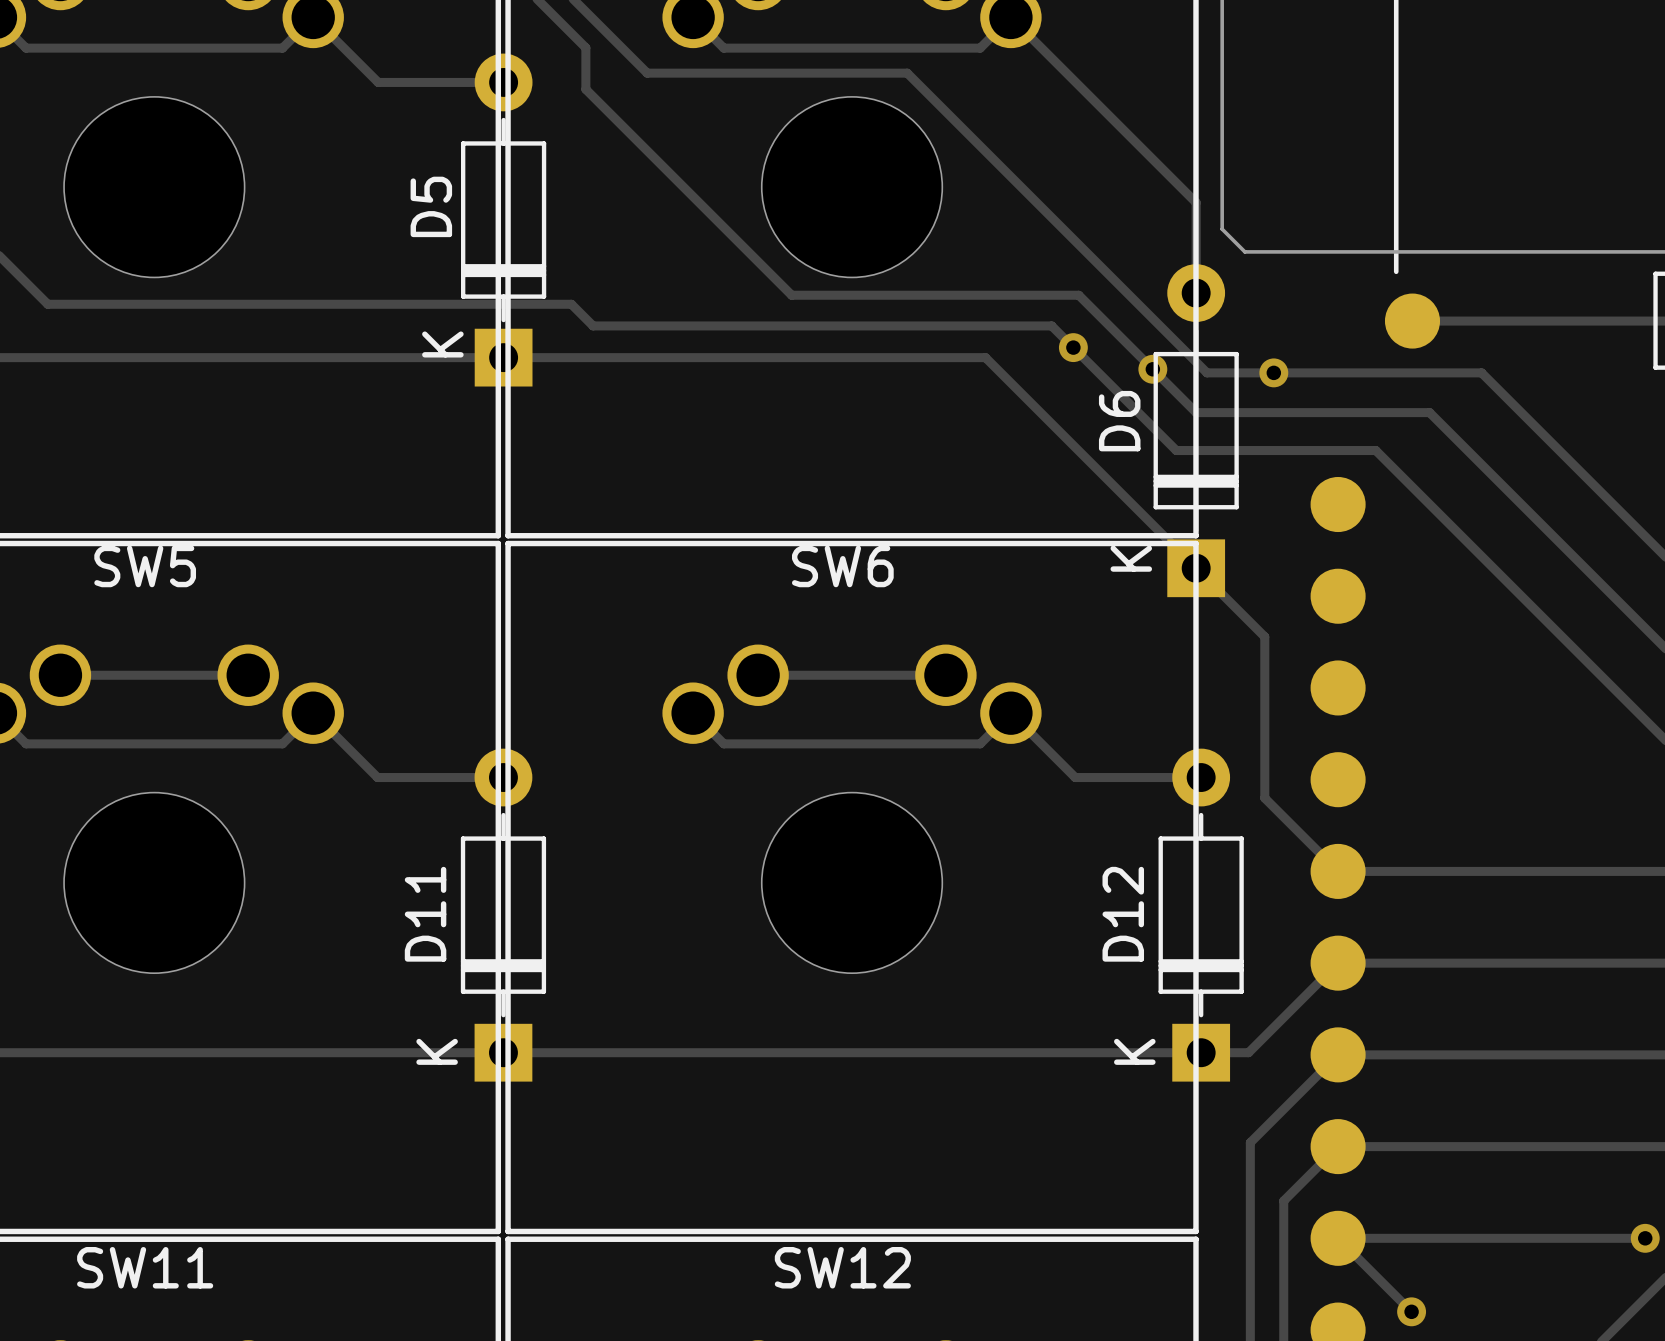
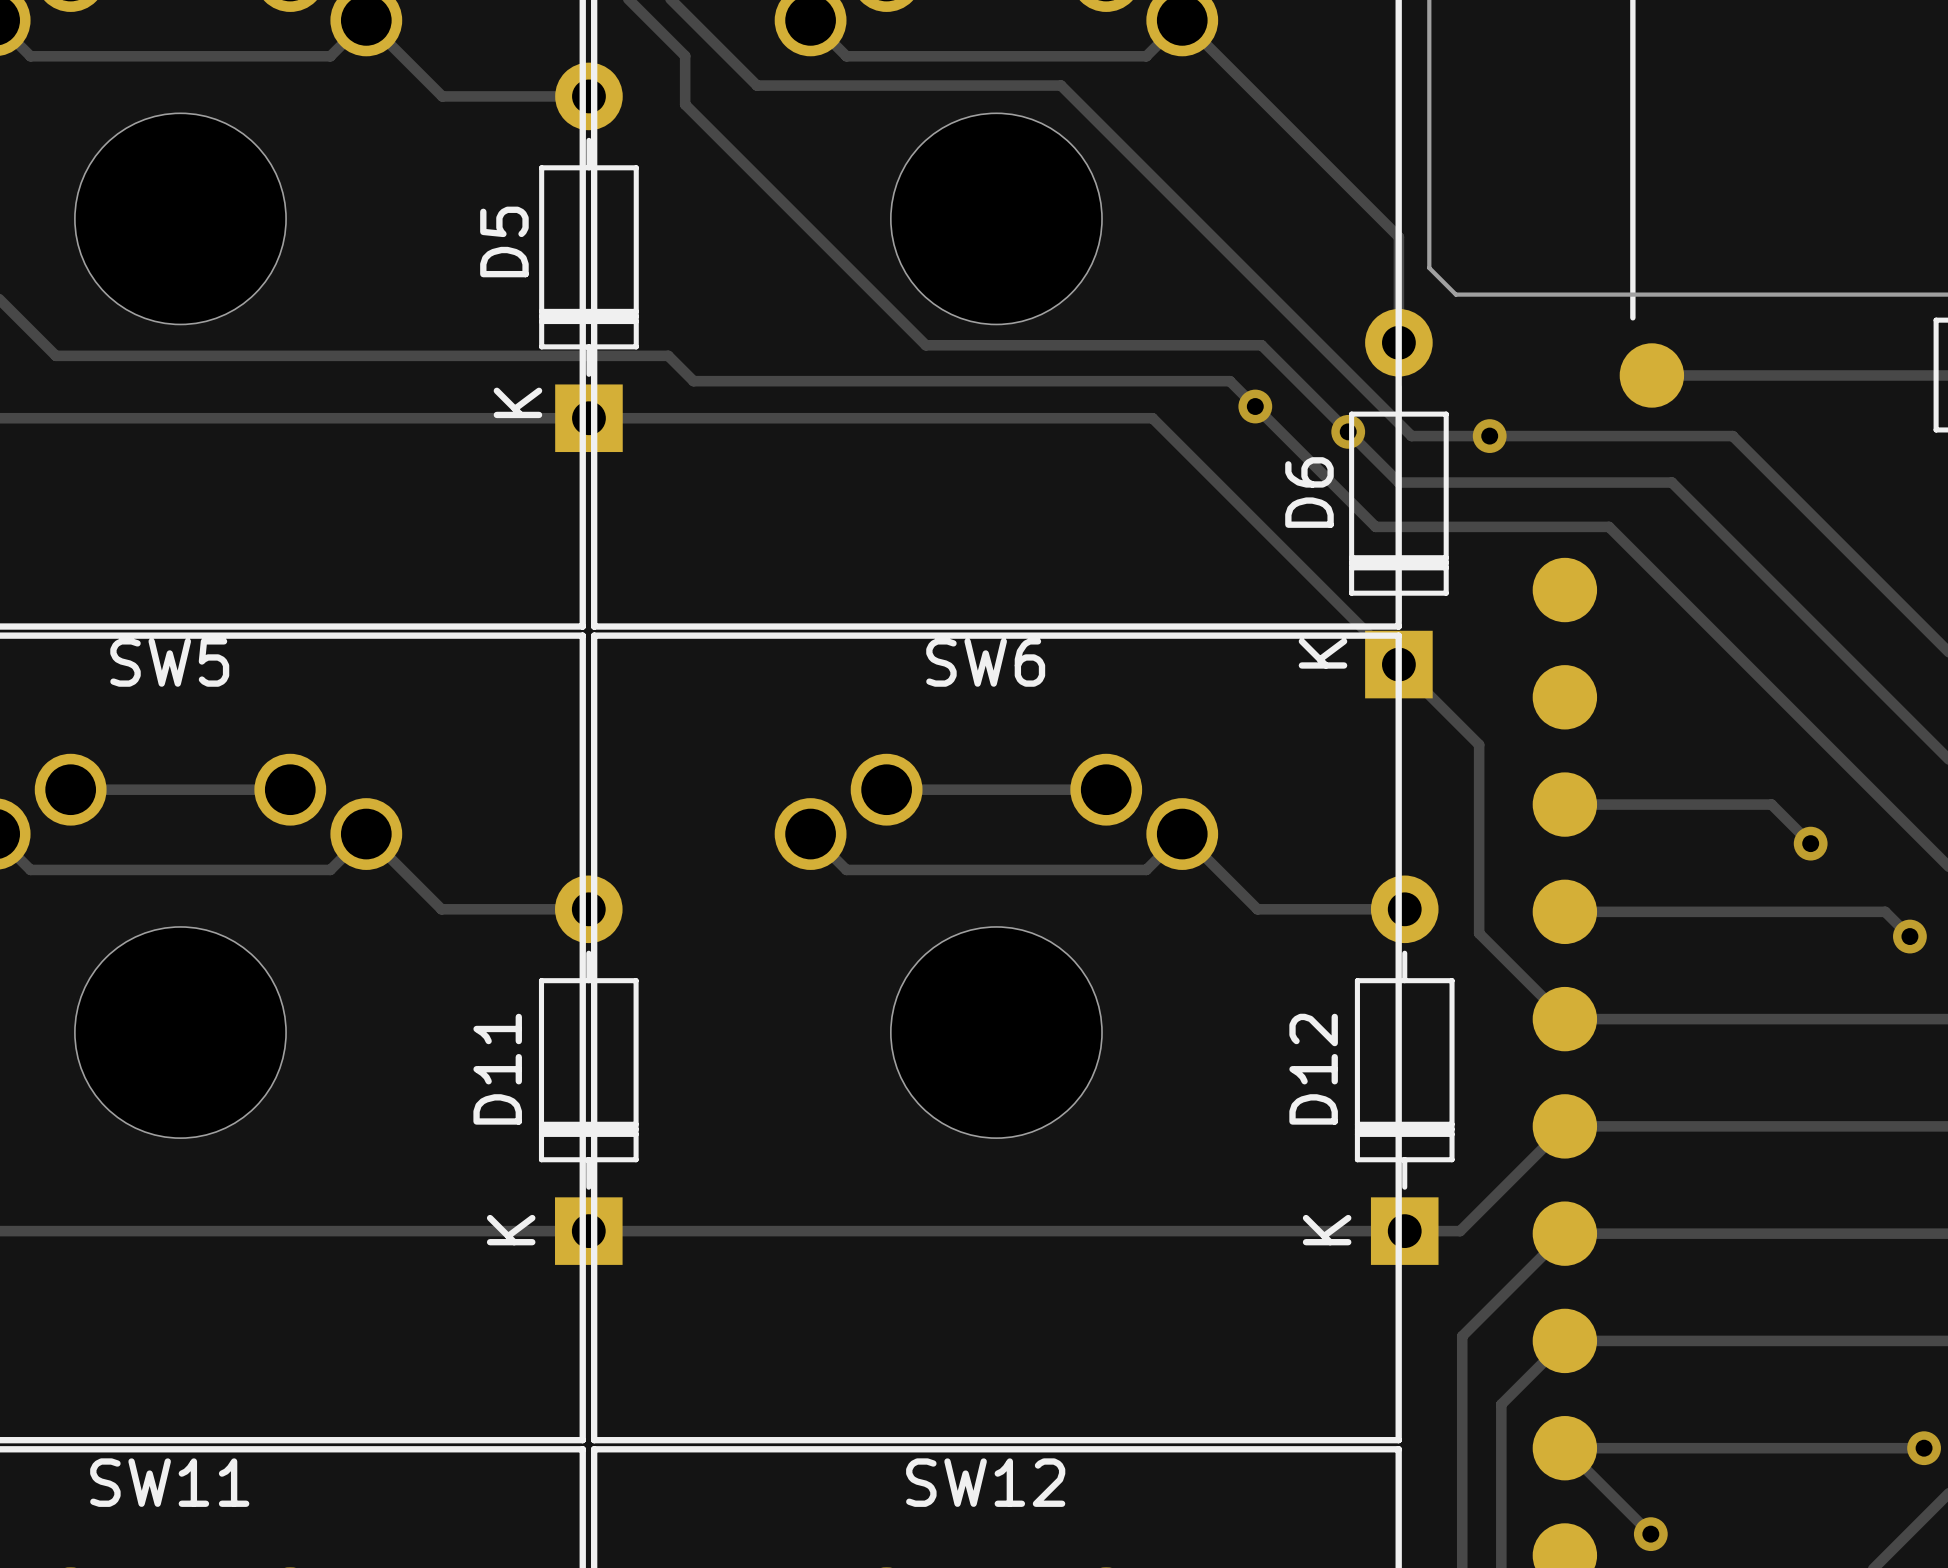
track: none -> (1564, 804) (1771, 804) (1810, 843)
via: none -> (1810, 843)
track: none -> (1564, 911) (1885, 911) (1909, 936)
via: none -> (1909, 936)

